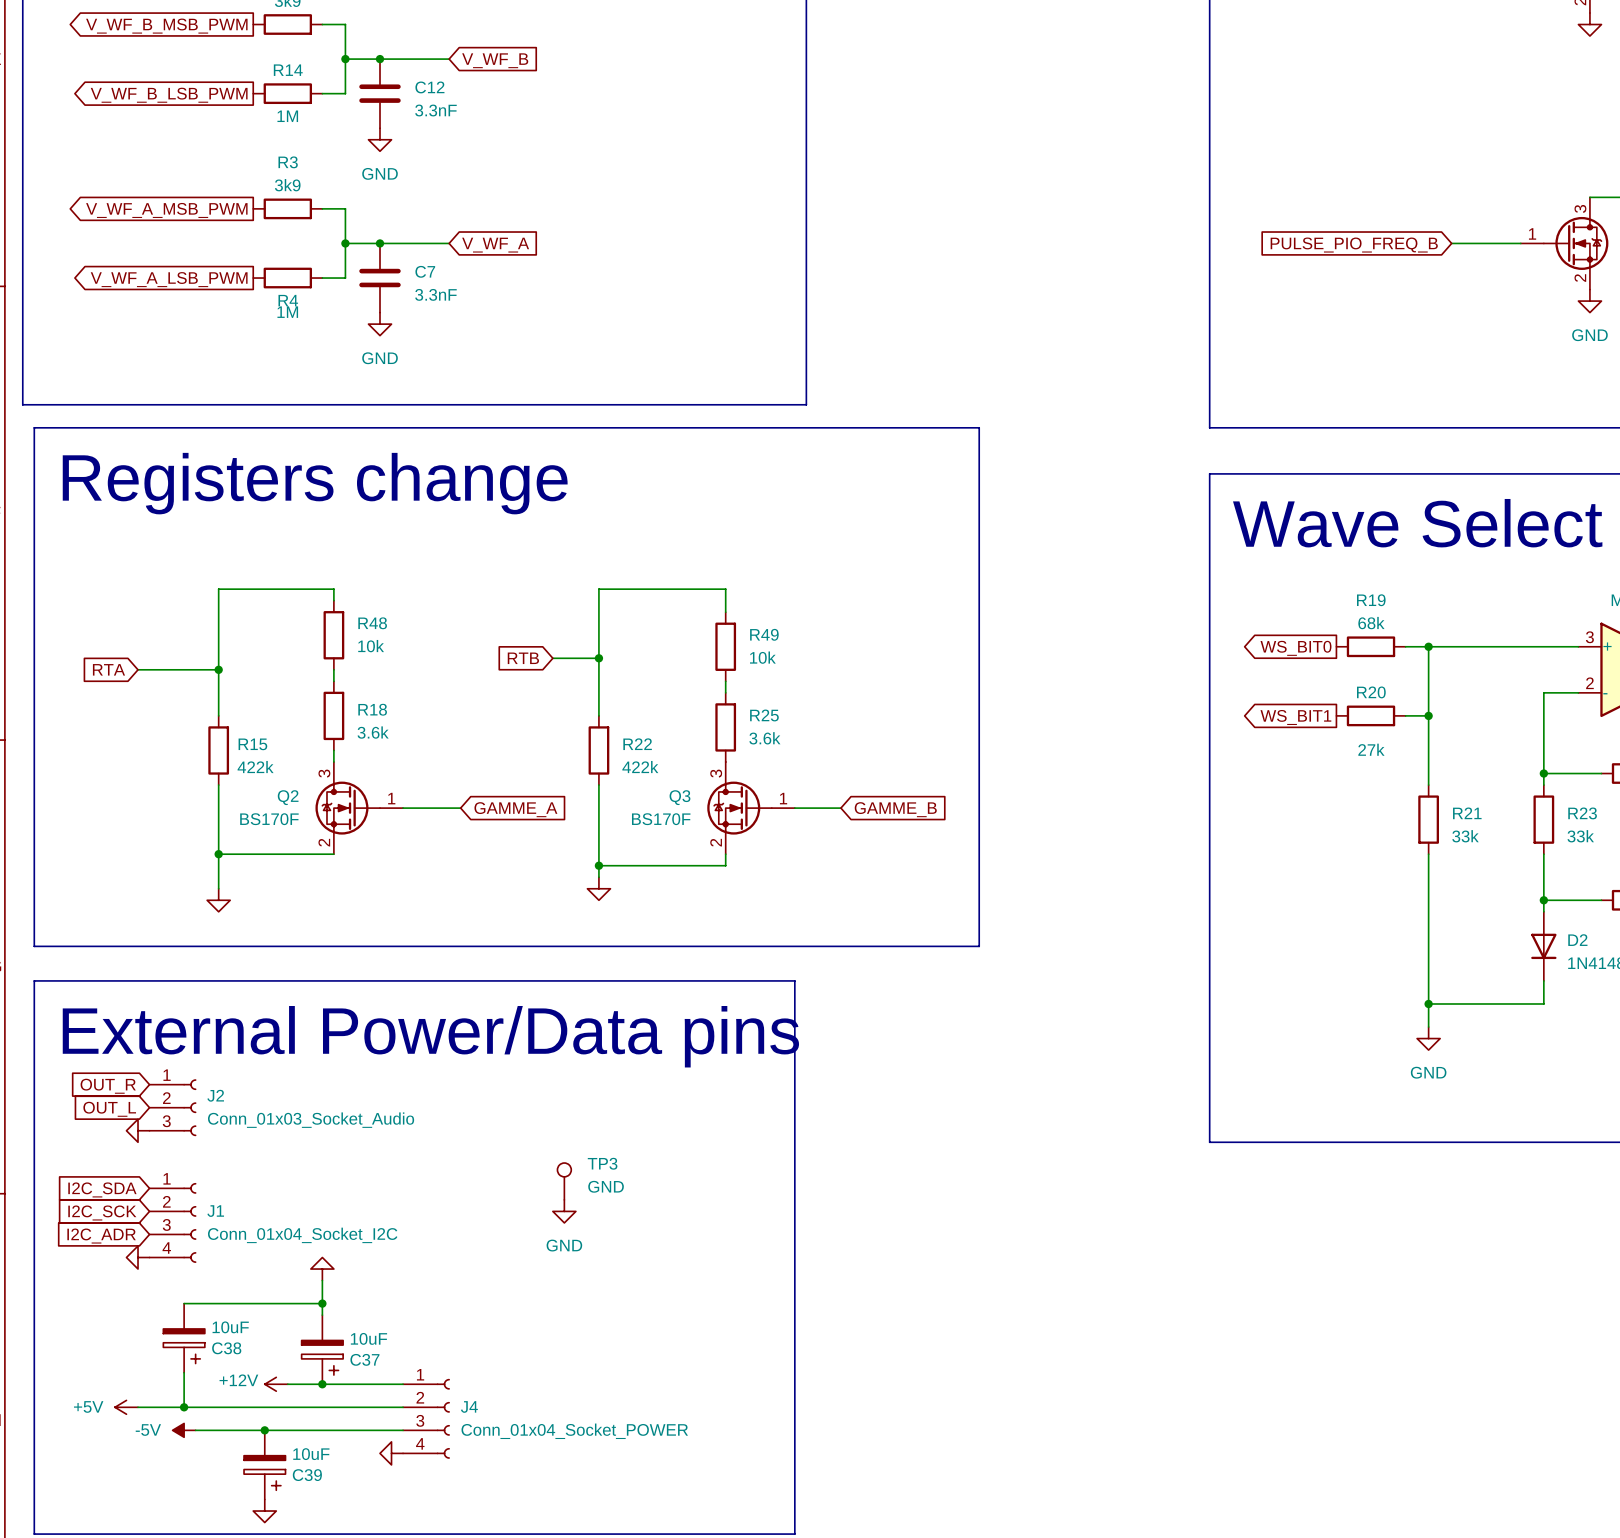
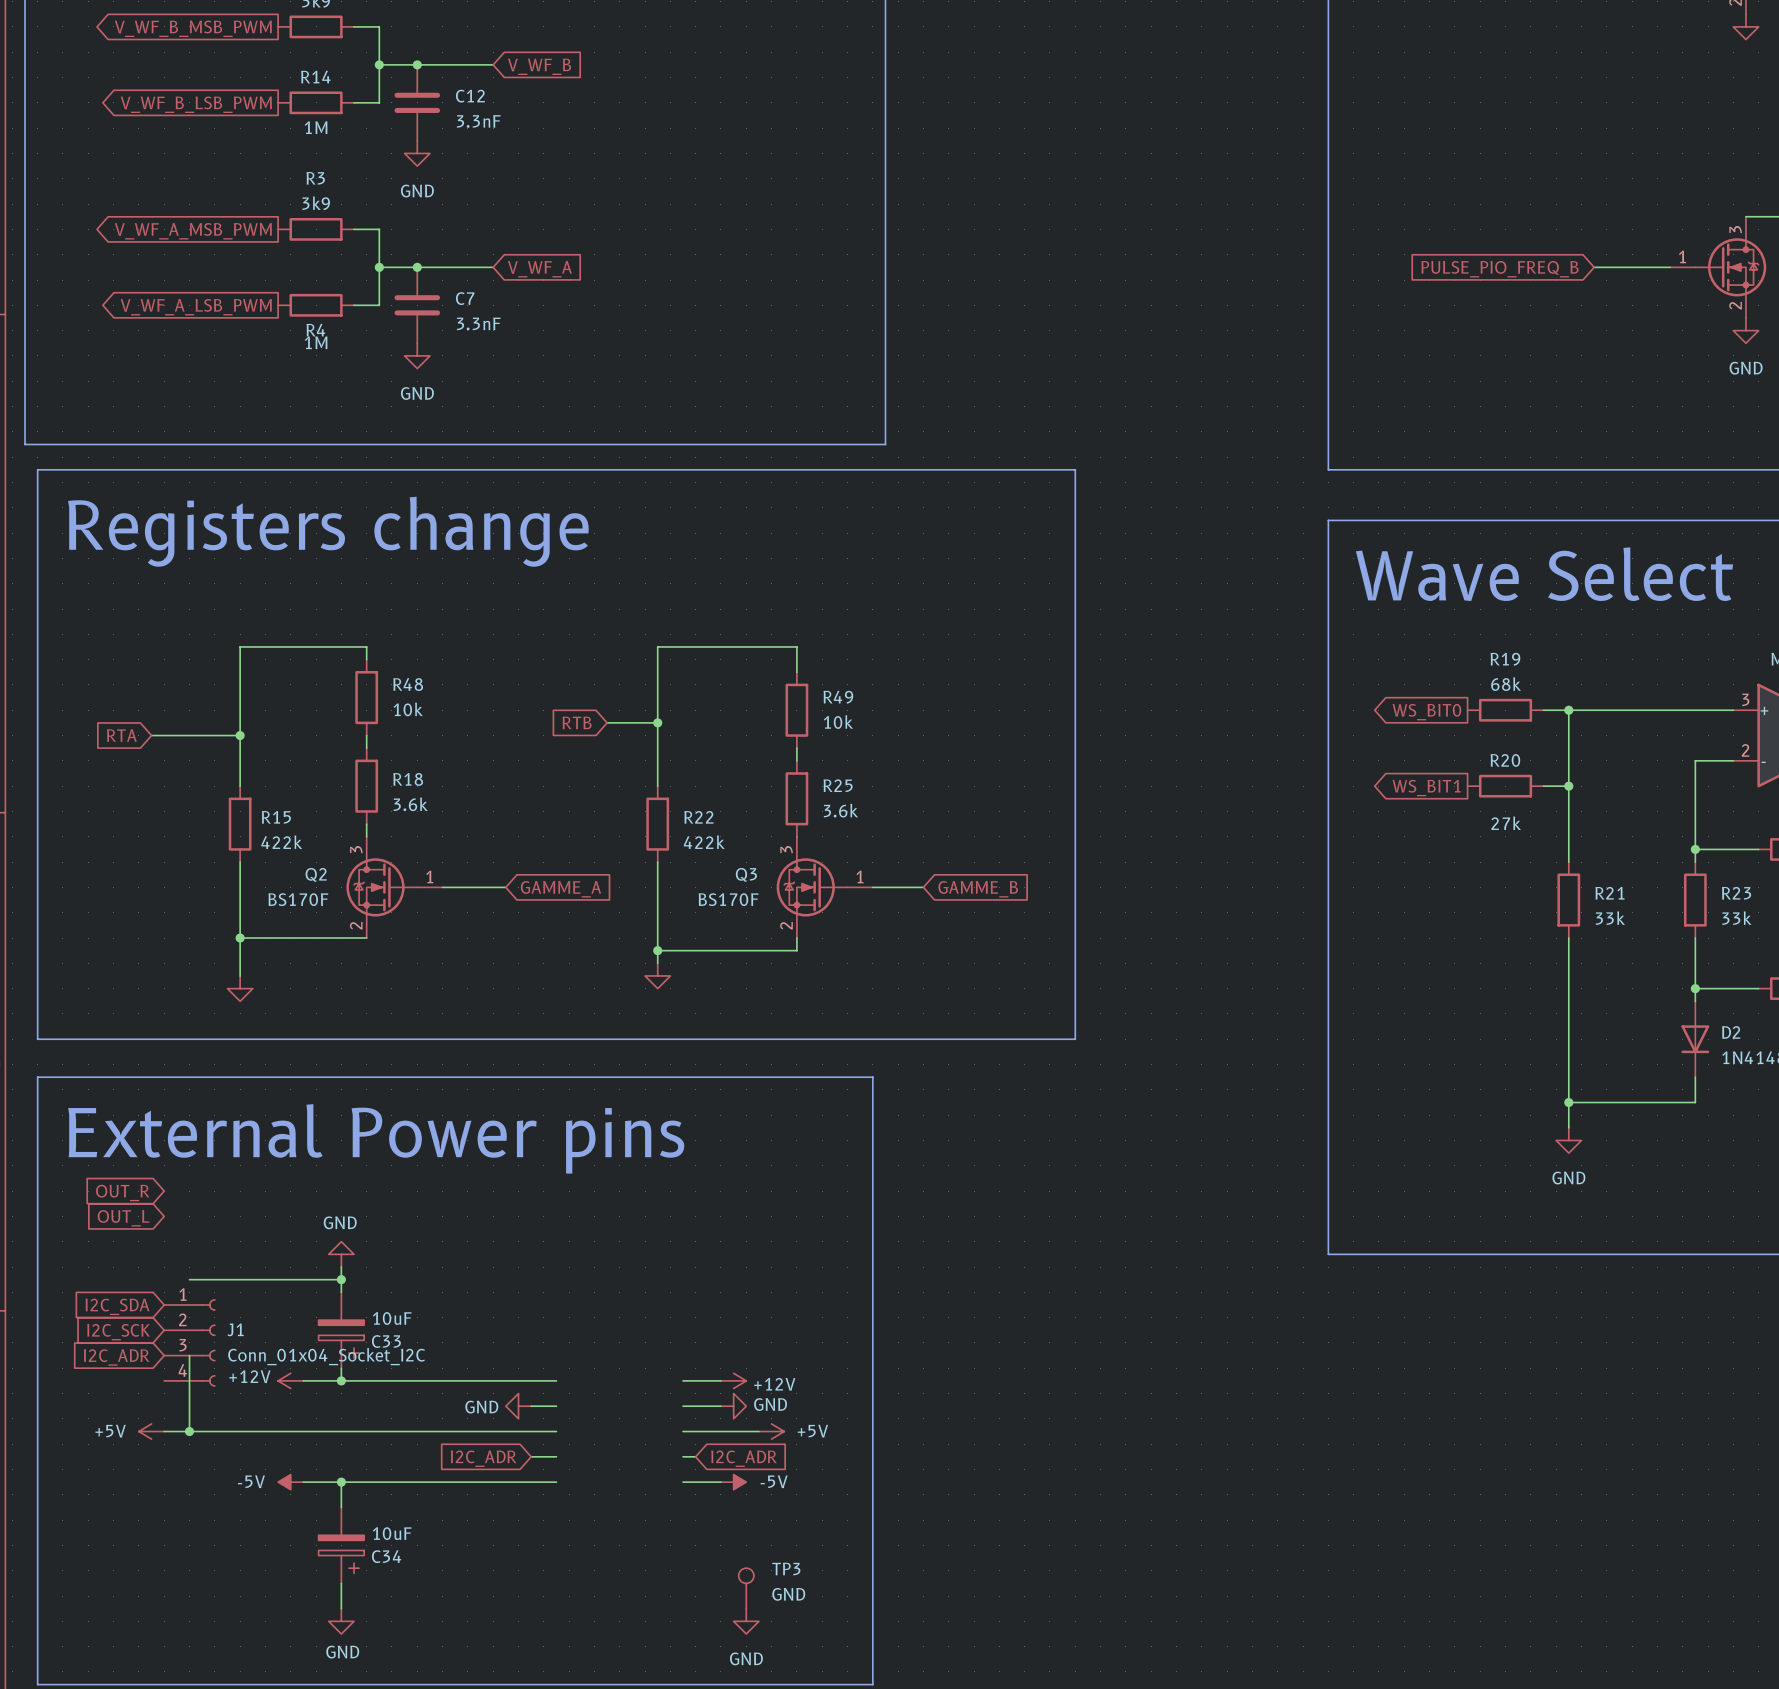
text: External Power/Data pins (430, 1036) -> External Power pins (376, 1138)
J2: Conn_01x03_Socket_Audio (172, 1107) -> none
power symbol: (138, 1130) -> none
power symbol: none -> GND (341, 1254)
wire: none -> (341, 1267) (341, 1292)
wire: none -> (189, 1279) (341, 1279)
junction: none -> (341, 1279)
TP3 position: (564, 1181) -> (746, 1588)
C33: none -> 10uF (341, 1330)
power symbol: GND (564, 1211) -> none
wire: none -> (189, 1355) (189, 1431)
wire: none -> (341, 1368) (341, 1380)
power symbol: (138, 1257) -> none
wire: none -> (303, 1380) (556, 1380)
junction: none -> (341, 1380)
wire: none -> (683, 1380) (720, 1380)
power symbol: none -> +12V (733, 1380)
power symbol: (322, 1269) -> none
wire: (322, 1280) (322, 1315) -> none
power symbol: none -> GND (518, 1406)
wire: none -> (531, 1406) (556, 1406)
wire: none -> (683, 1406) (720, 1406)
power symbol: none -> GND (733, 1406)
wire: none -> (164, 1431) (202, 1431)
junction: none -> (189, 1431)
wire: none -> (354, 1431) (556, 1431)
junction: (322, 1303) -> none
wire: none -> (683, 1431) (758, 1431)
power symbol: none -> +5V (771, 1431)
wire: none -> (531, 1456) (556, 1456)
wire: none -> (683, 1456) (695, 1456)
global label: none -> I2C_ADR (483, 1458)
global label: none -> I2C_ADR (744, 1458)
C38: 10uF (184, 1338) -> none
wire: none -> (303, 1482) (556, 1482)
wire: none -> (341, 1482) (341, 1507)
junction: none -> (341, 1482)
C37: 10uF (322, 1349) -> none
wire: none -> (683, 1482) (720, 1482)
power symbol: none -> -5V (733, 1482)
wire: (184, 1372) (184, 1407) -> none
power symbol position: +12V (276, 1384) -> +12V (290, 1380)
wire: (287, 1384) (403, 1384) -> none
junction: (322, 1384) -> none
power symbol position: +5V (126, 1407) -> +5V (151, 1431)
wire: (138, 1407) (403, 1407) -> none
junction: (184, 1407) -> none
C34: none -> 10uF (341, 1545)
J4: Conn_01x04_Socket_POWER (426, 1418) -> none
power symbol position: -5V (184, 1430) -> -5V (290, 1482)
wire: (195, 1430) (403, 1430) -> none
junction: (264, 1430) -> none
wire: none -> (341, 1583) (341, 1608)
power symbol: (391, 1453) -> none
C39: 10uF (264, 1464) -> none
power symbol: none -> GND (341, 1621)
power symbol: none -> GND (746, 1621)
power symbol: (264, 1511) -> none

